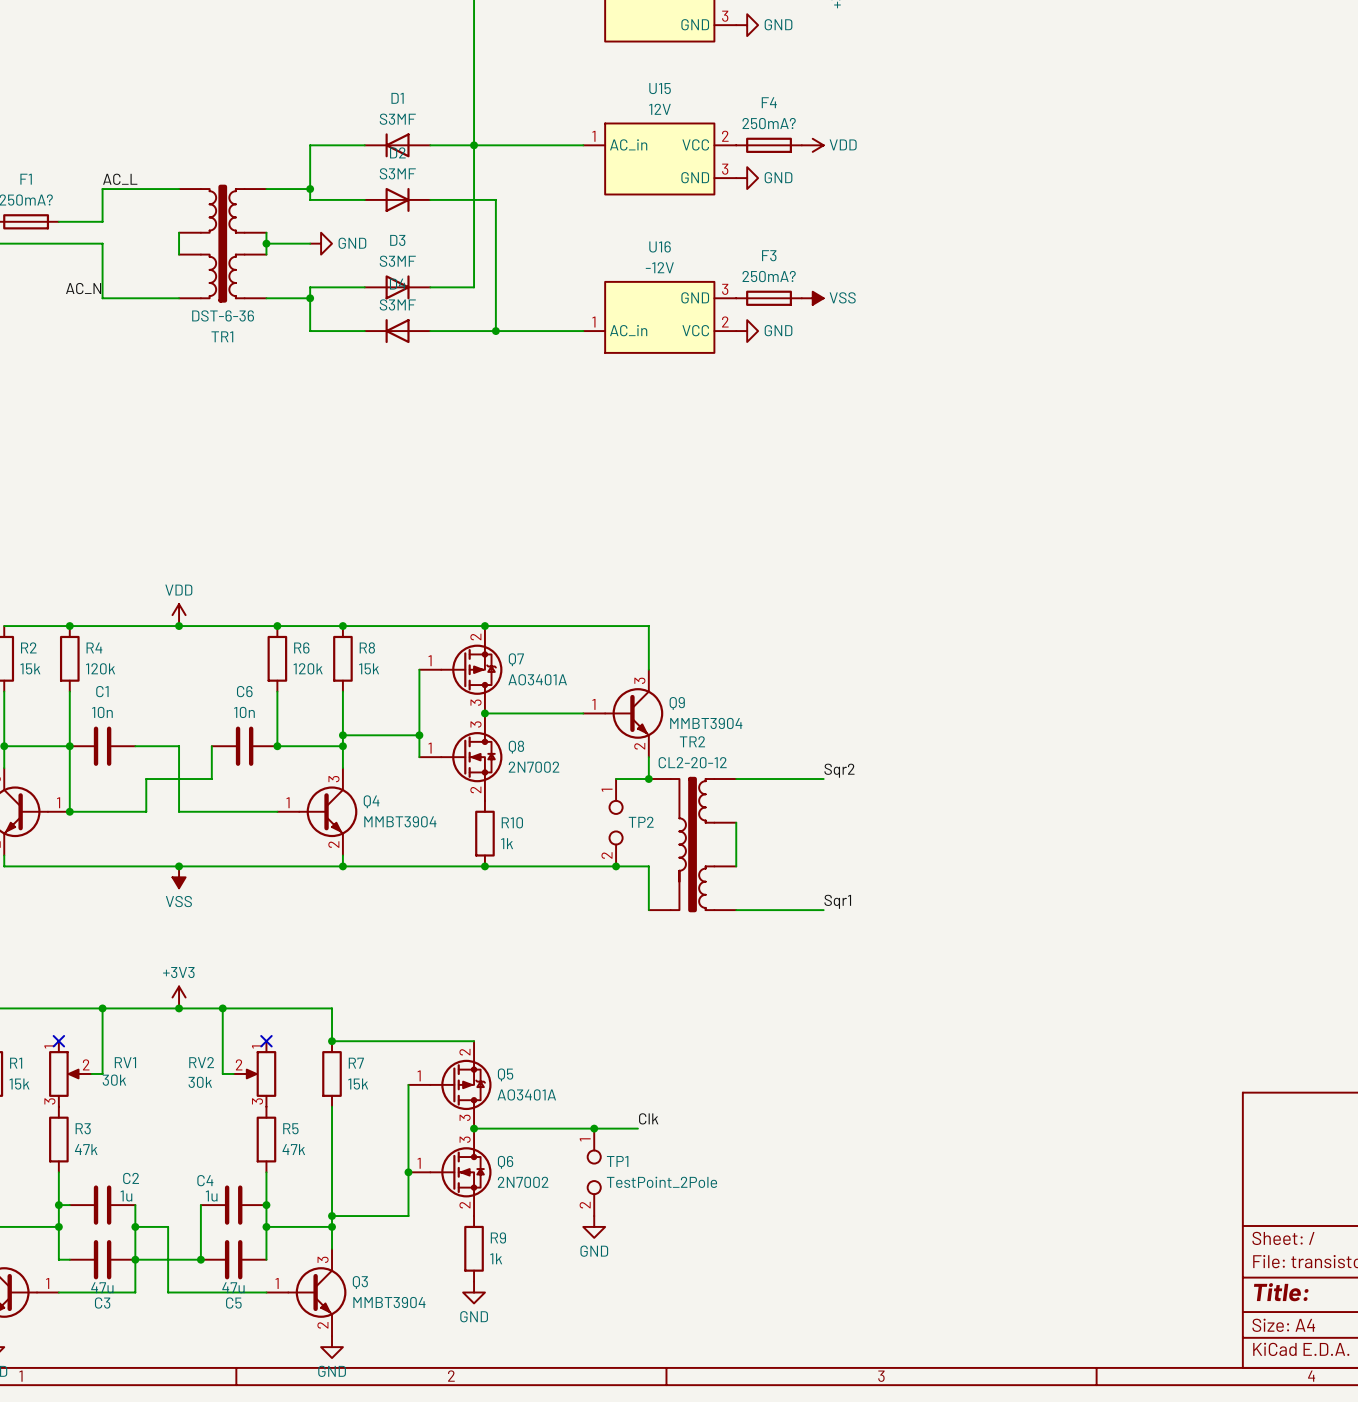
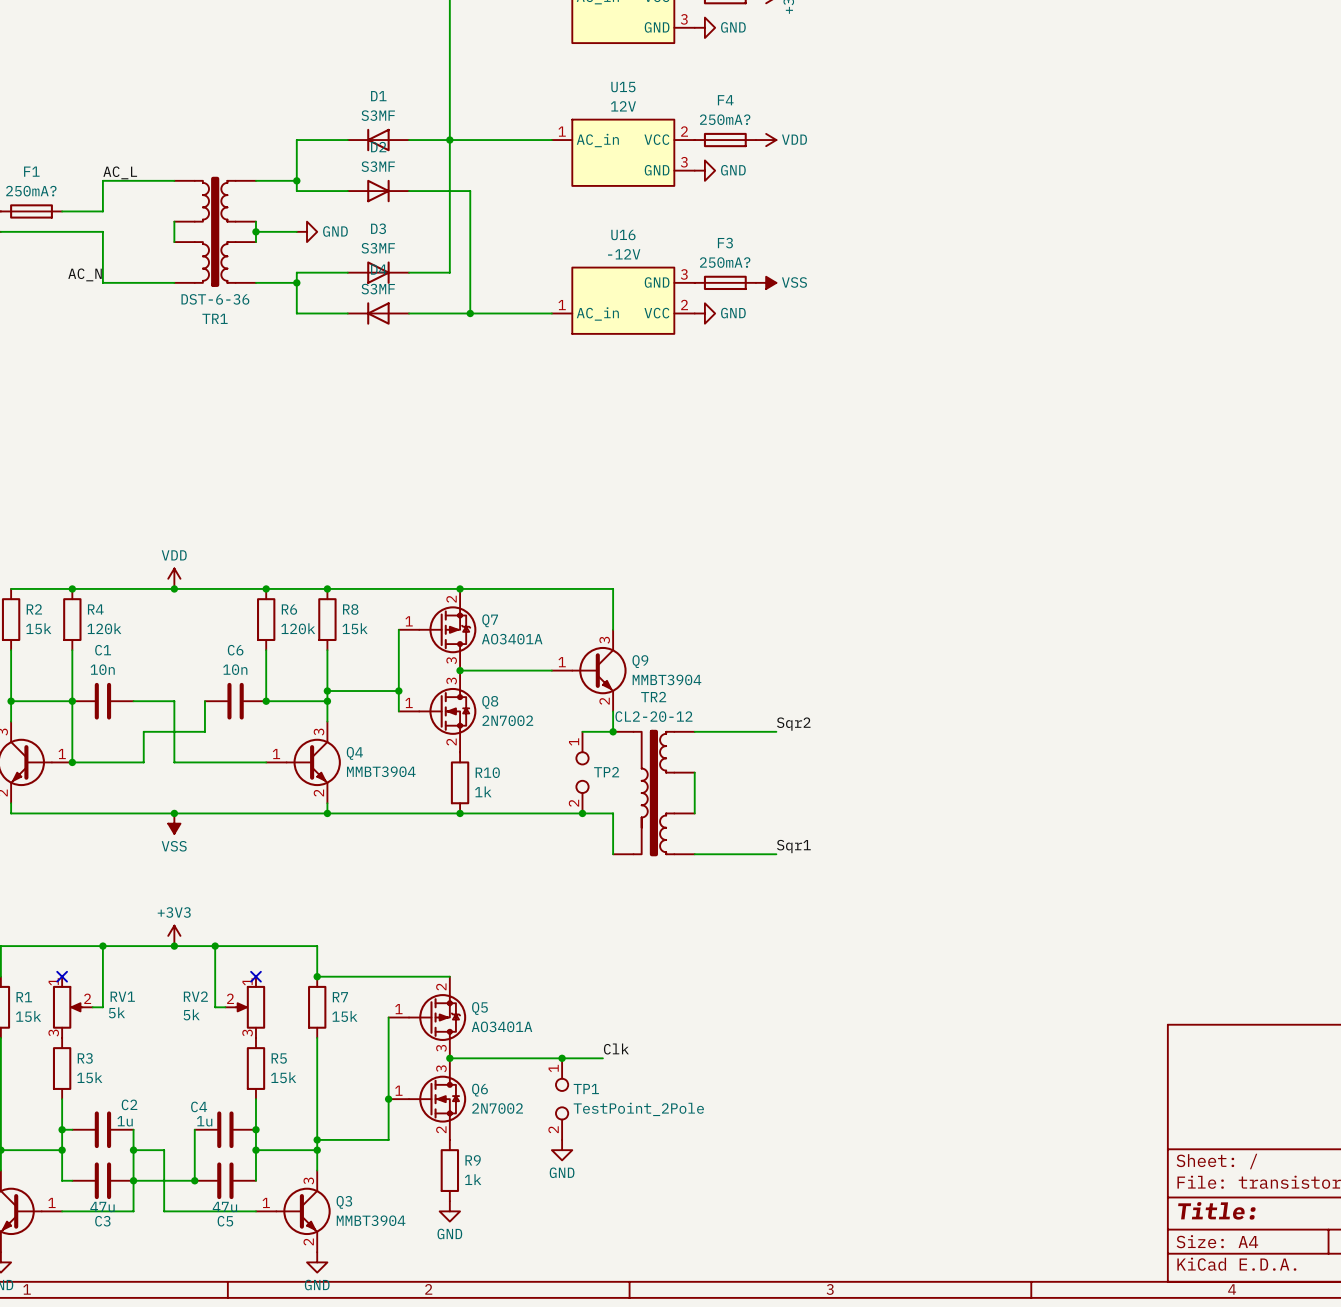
RV1 value: 30k (114, 1080) -> 5k (116, 1012)
RV2 value: 30k (200, 1082) -> 5k (191, 1014)
R3 value: 47k (86, 1149) -> 15k (89, 1077)
R5 value: 47k (293, 1149) -> 15k (283, 1077)

